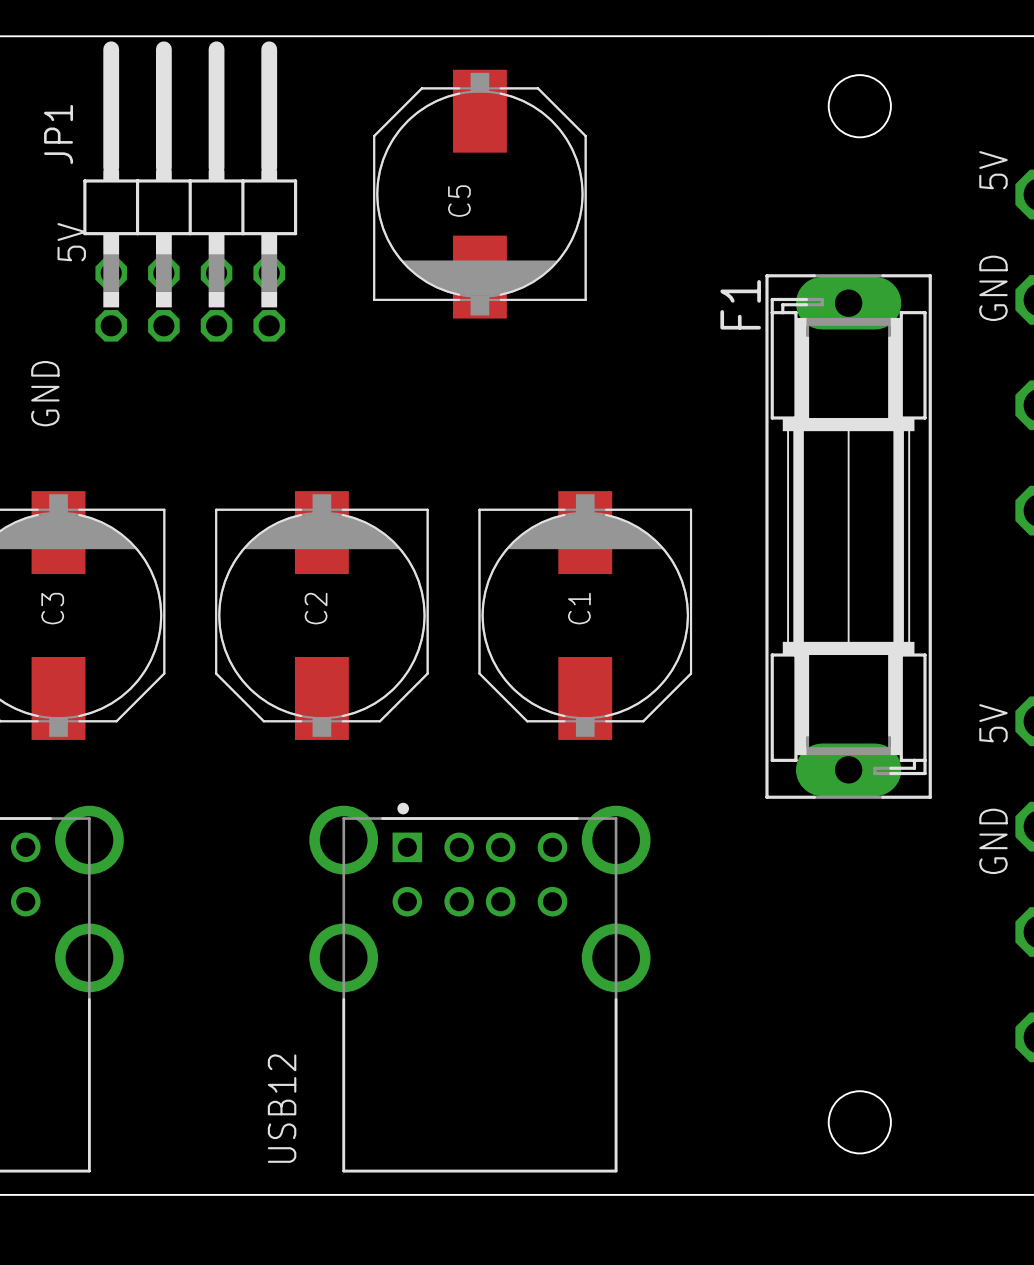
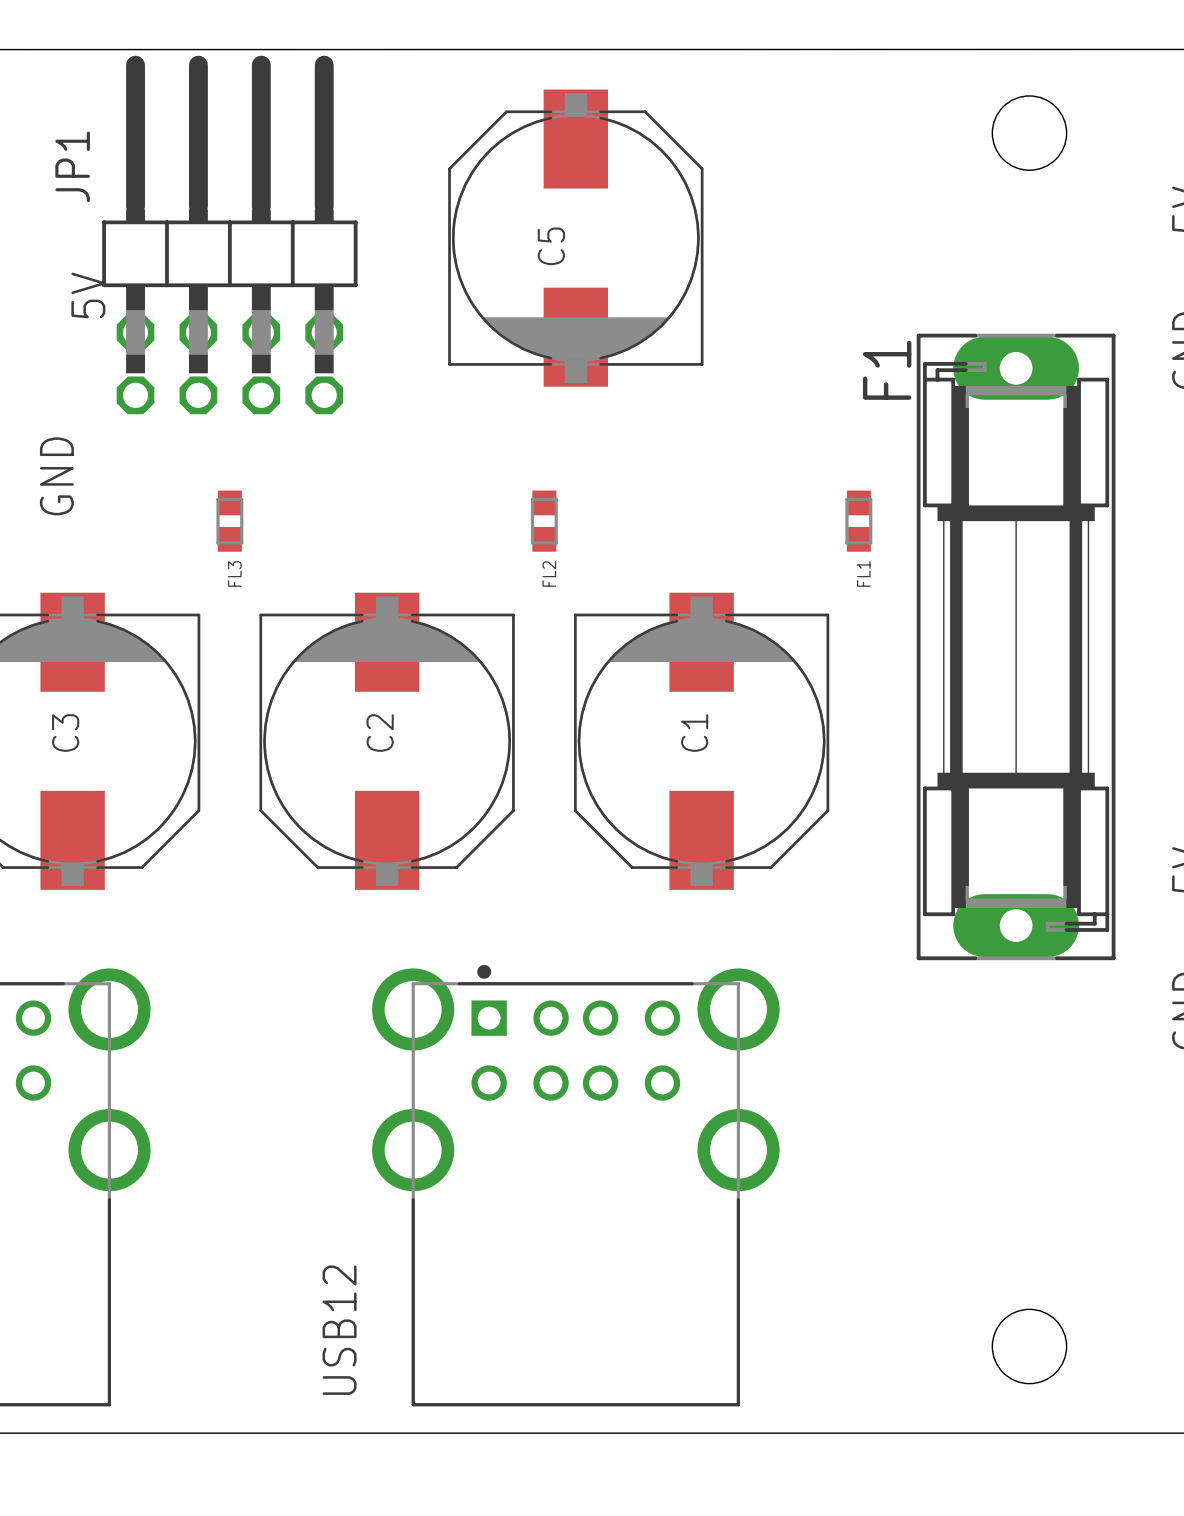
FL3: none -> (229, 521)
FL2: none -> (544, 521)
FL1: none -> (858, 521)

